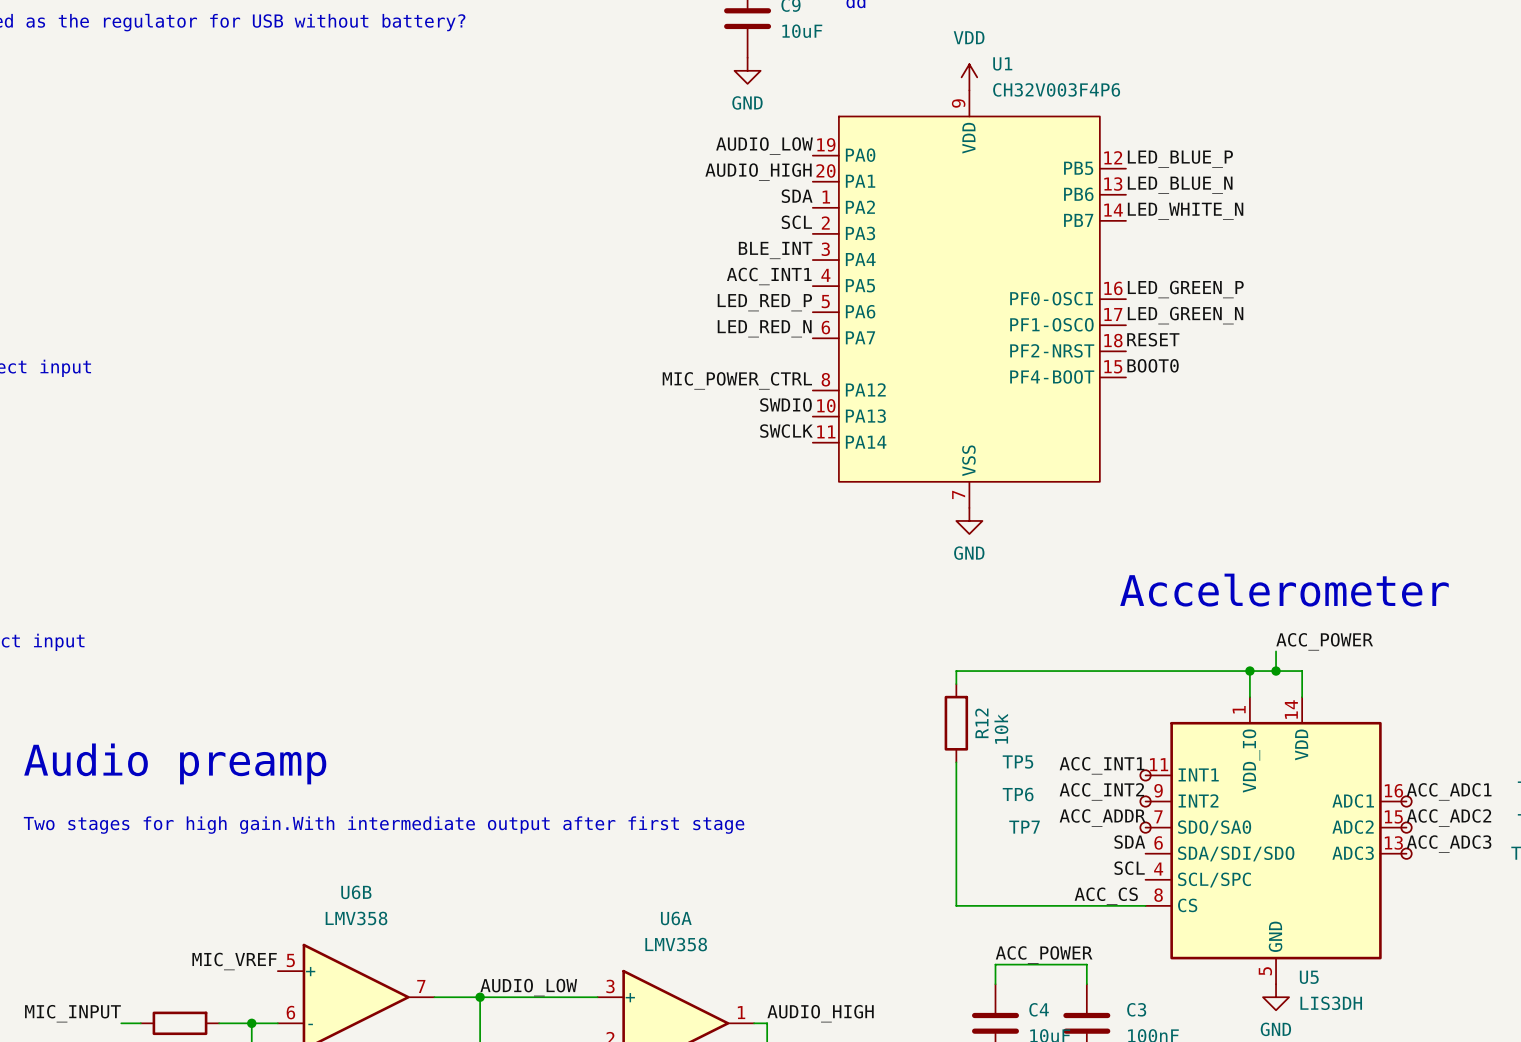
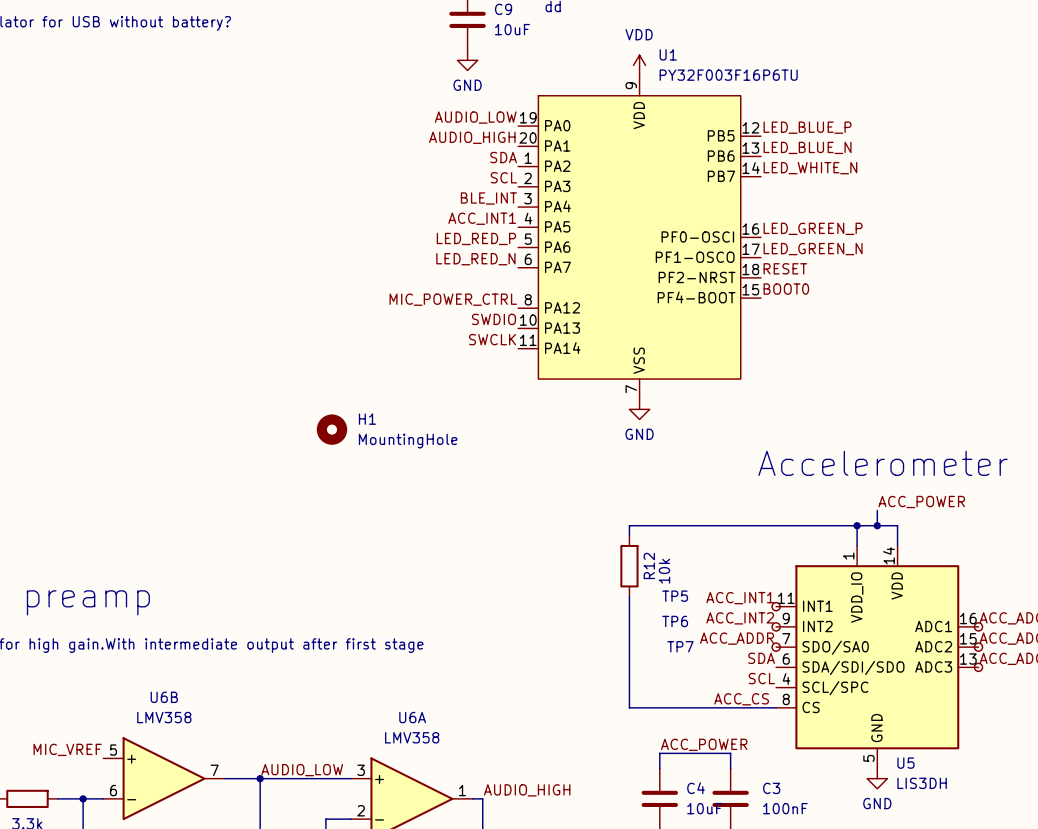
U1 value: CH32V003F4P6 (1056, 89) -> PY32F003F16P6TU (728, 75)
H1: none -> MountingHole (332, 429)

